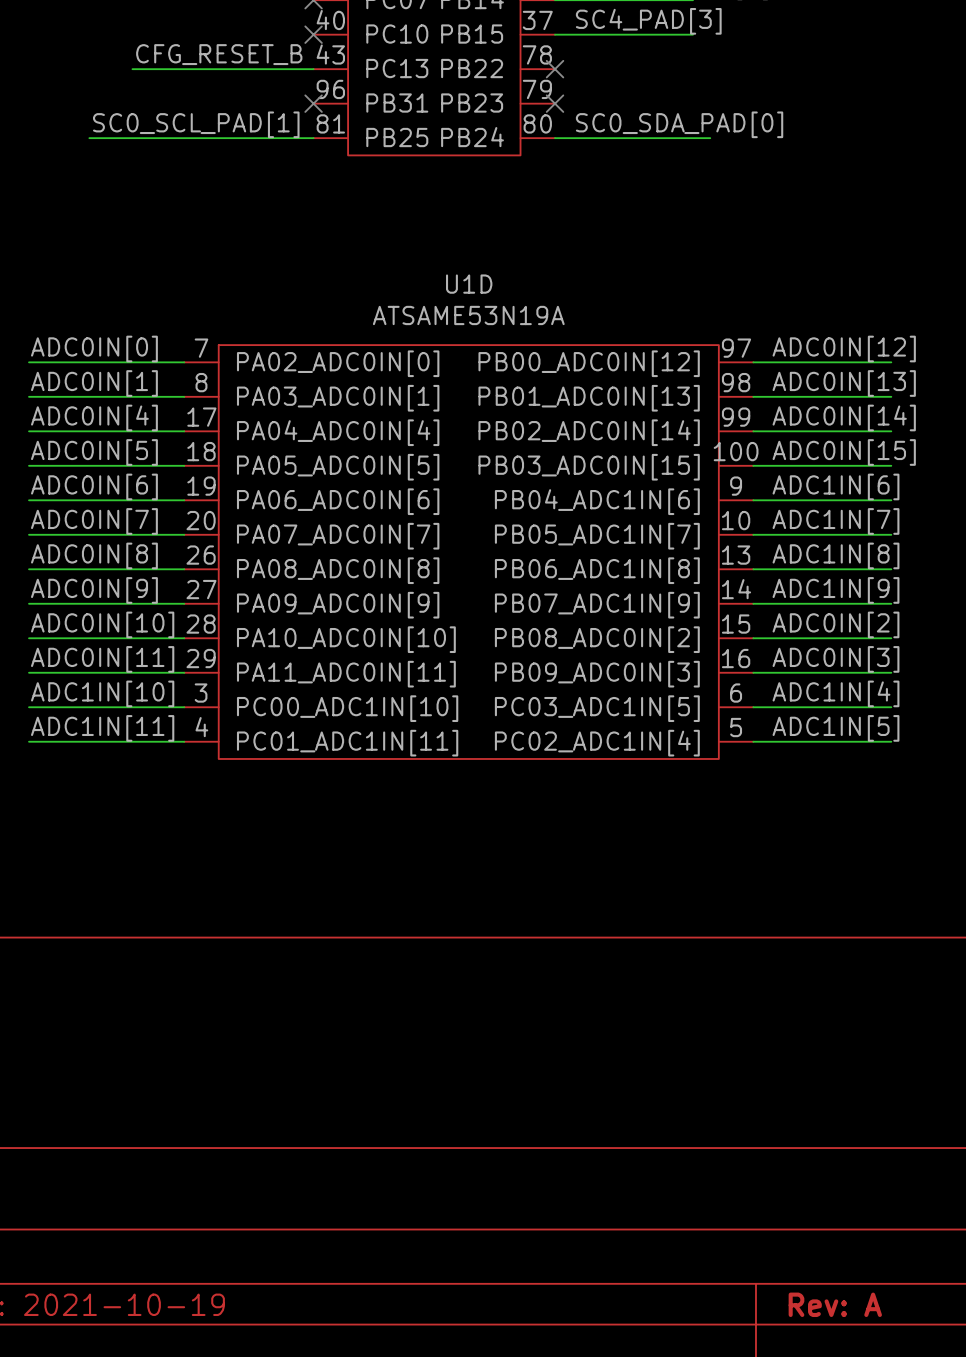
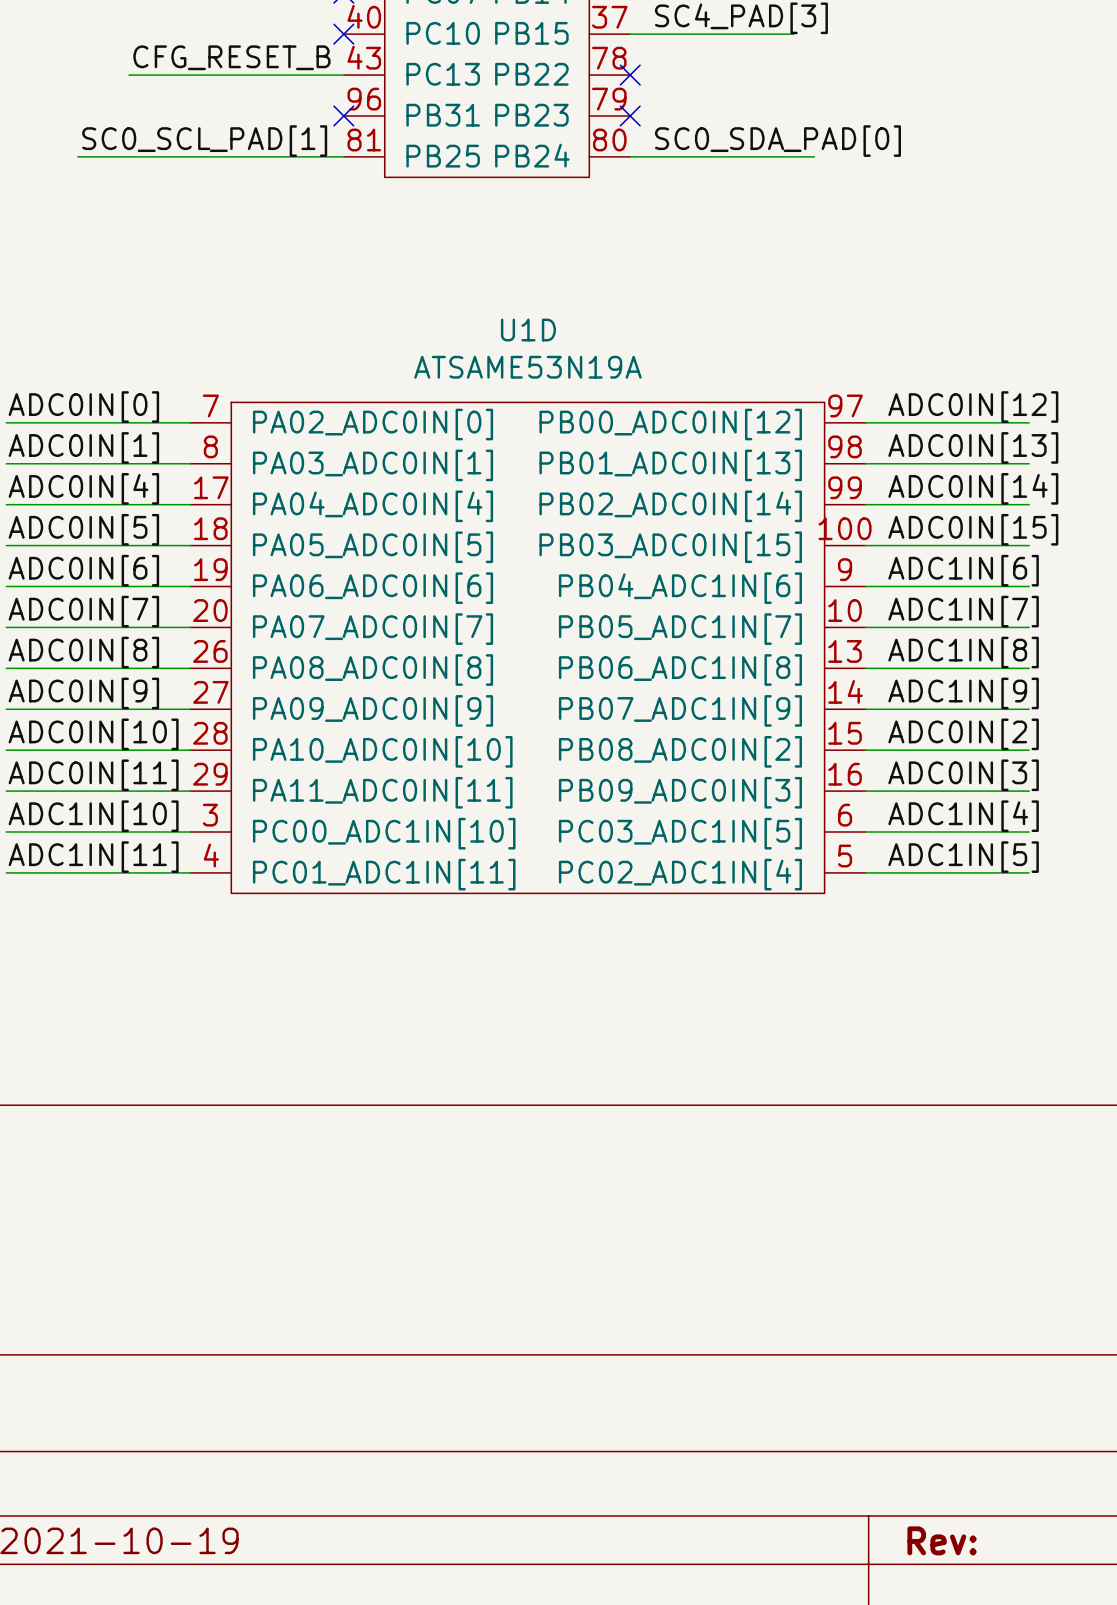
title block: Rev: A (835, 1304) -> Rev: (942, 1540)

